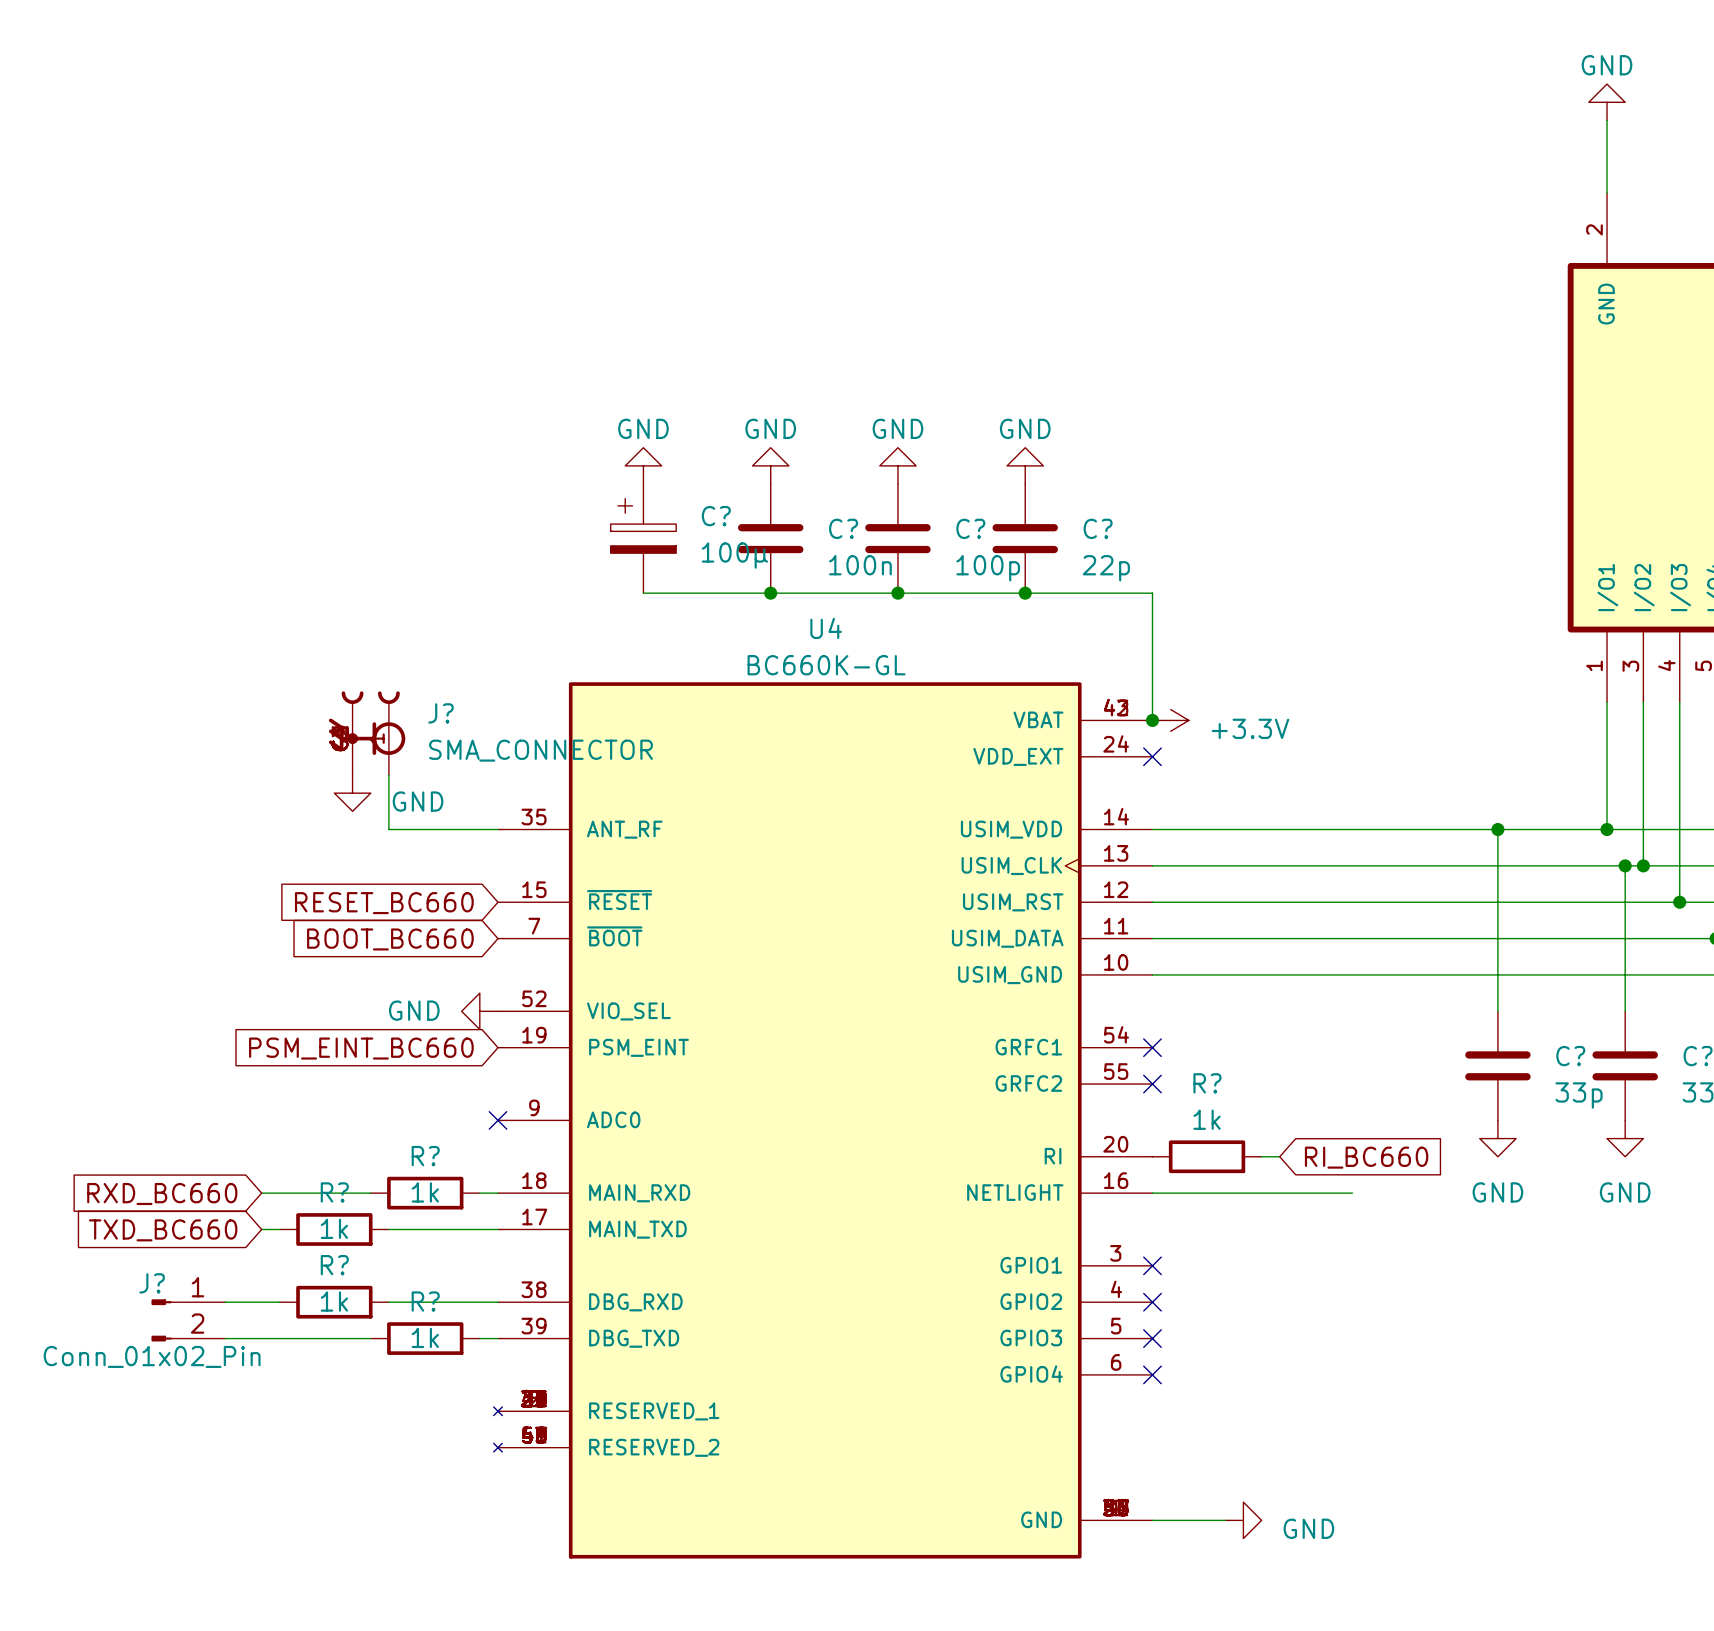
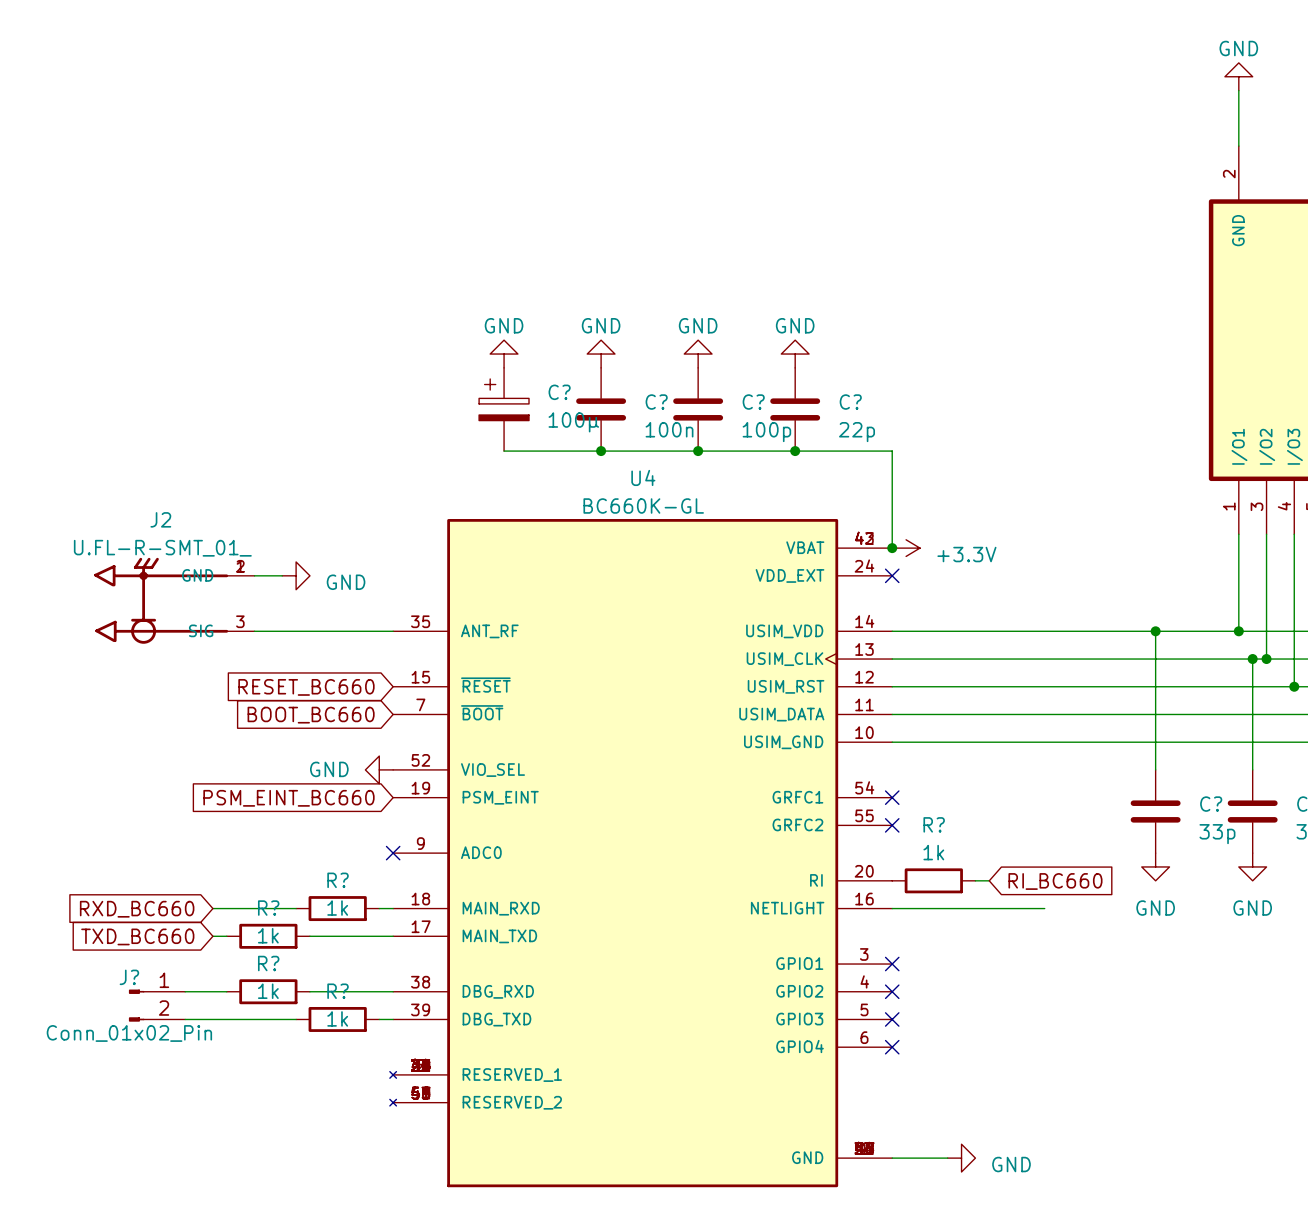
J?: SMA_CONNECTOR (367, 733) -> none
wire: none -> (254, 575) (282, 575)
wire: (388, 774) (388, 829) -> (254, 631) (309, 631)
J2: none -> U.FL-R-SMT_01_ (174, 600)
power symbol rotation: 0° (352, 793) -> 90° counterclockwise (296, 575)
power symbol position: GND (352, 793) -> GND (296, 575)

